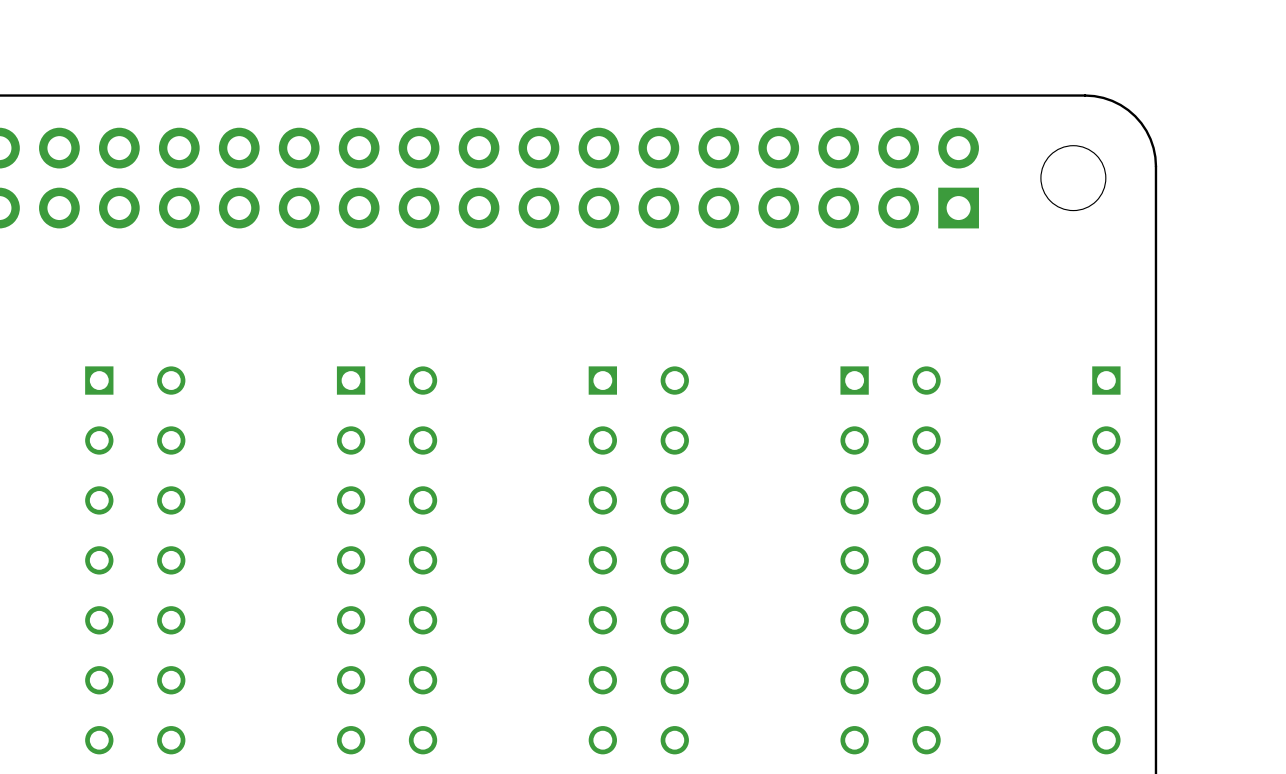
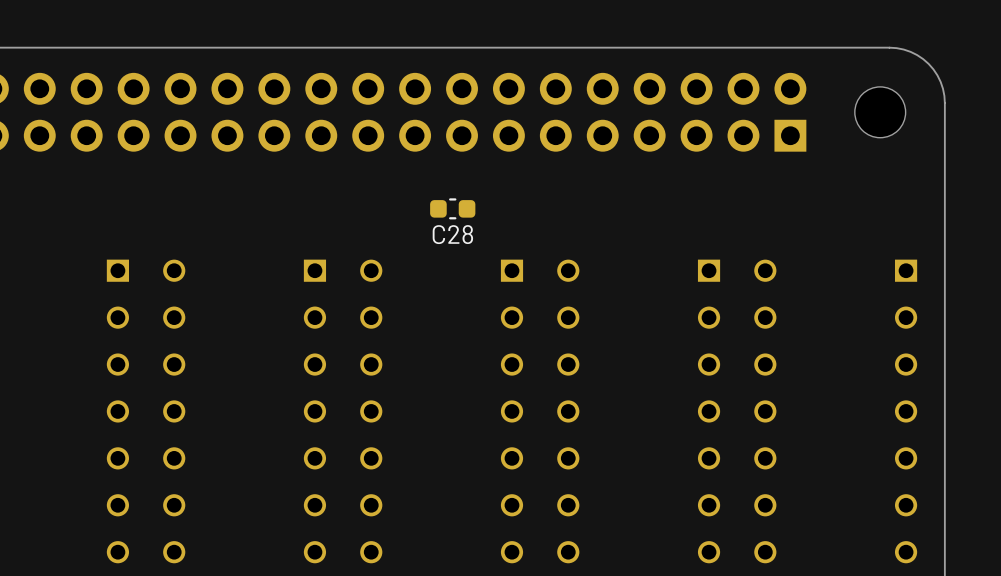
C28: none -> (452, 208)

